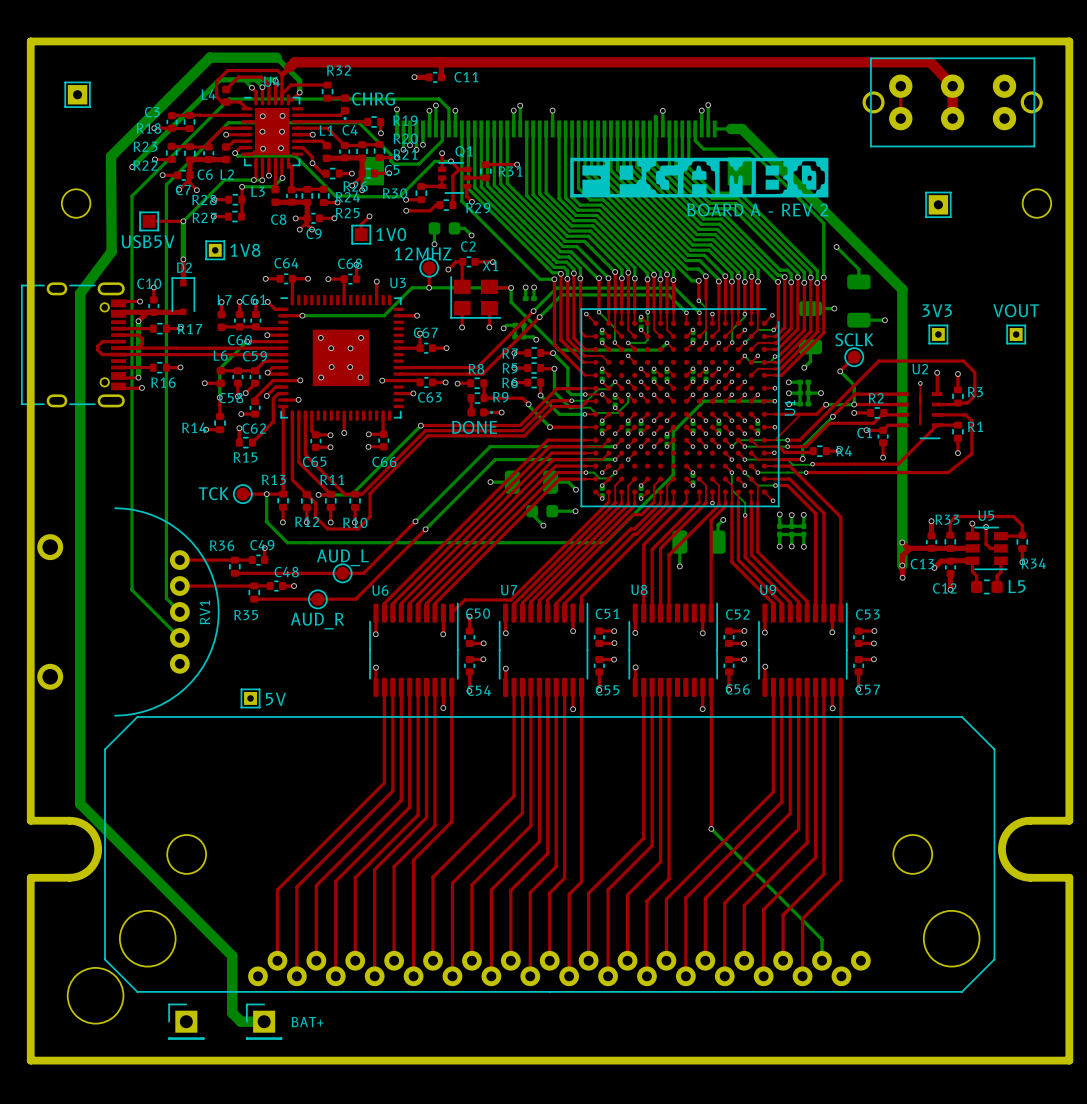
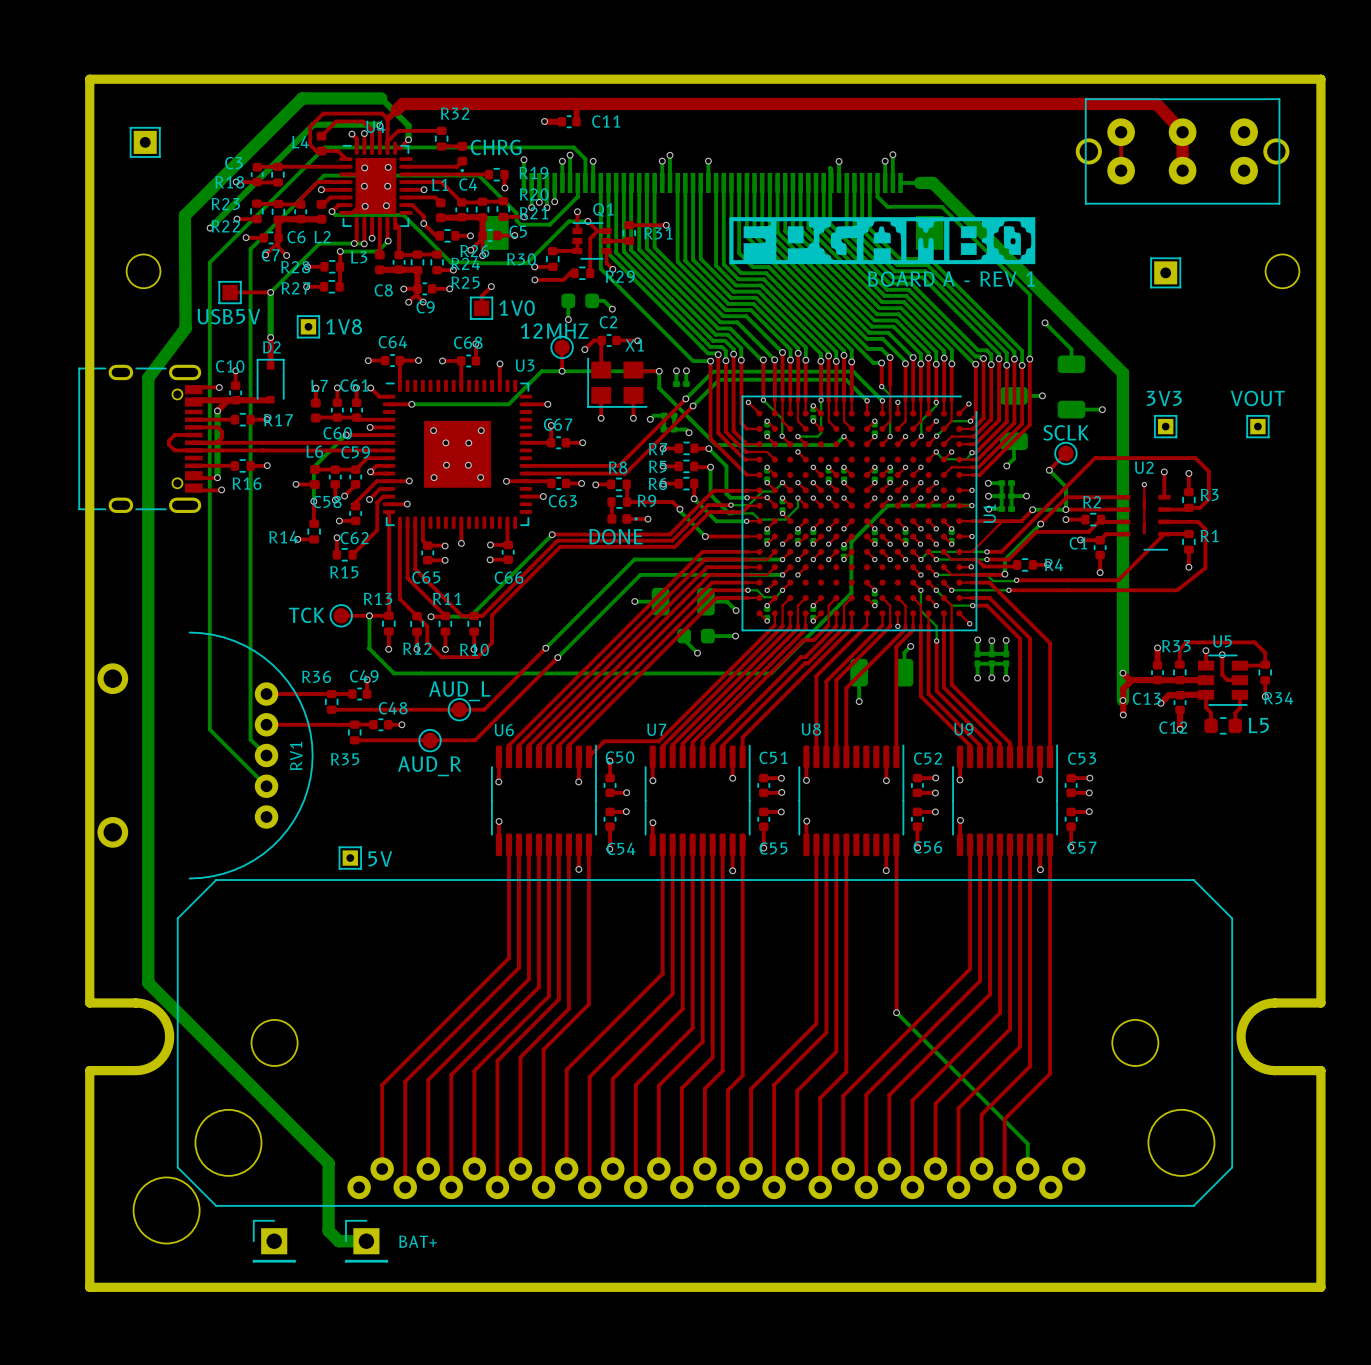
bottom track: (245, 79) (251, 87) -> none
bottom track: (256, 79) (262, 87) -> none
text: BOARD A - REV 2 (757, 210) -> BOARD A - REV 1 (951, 279)

